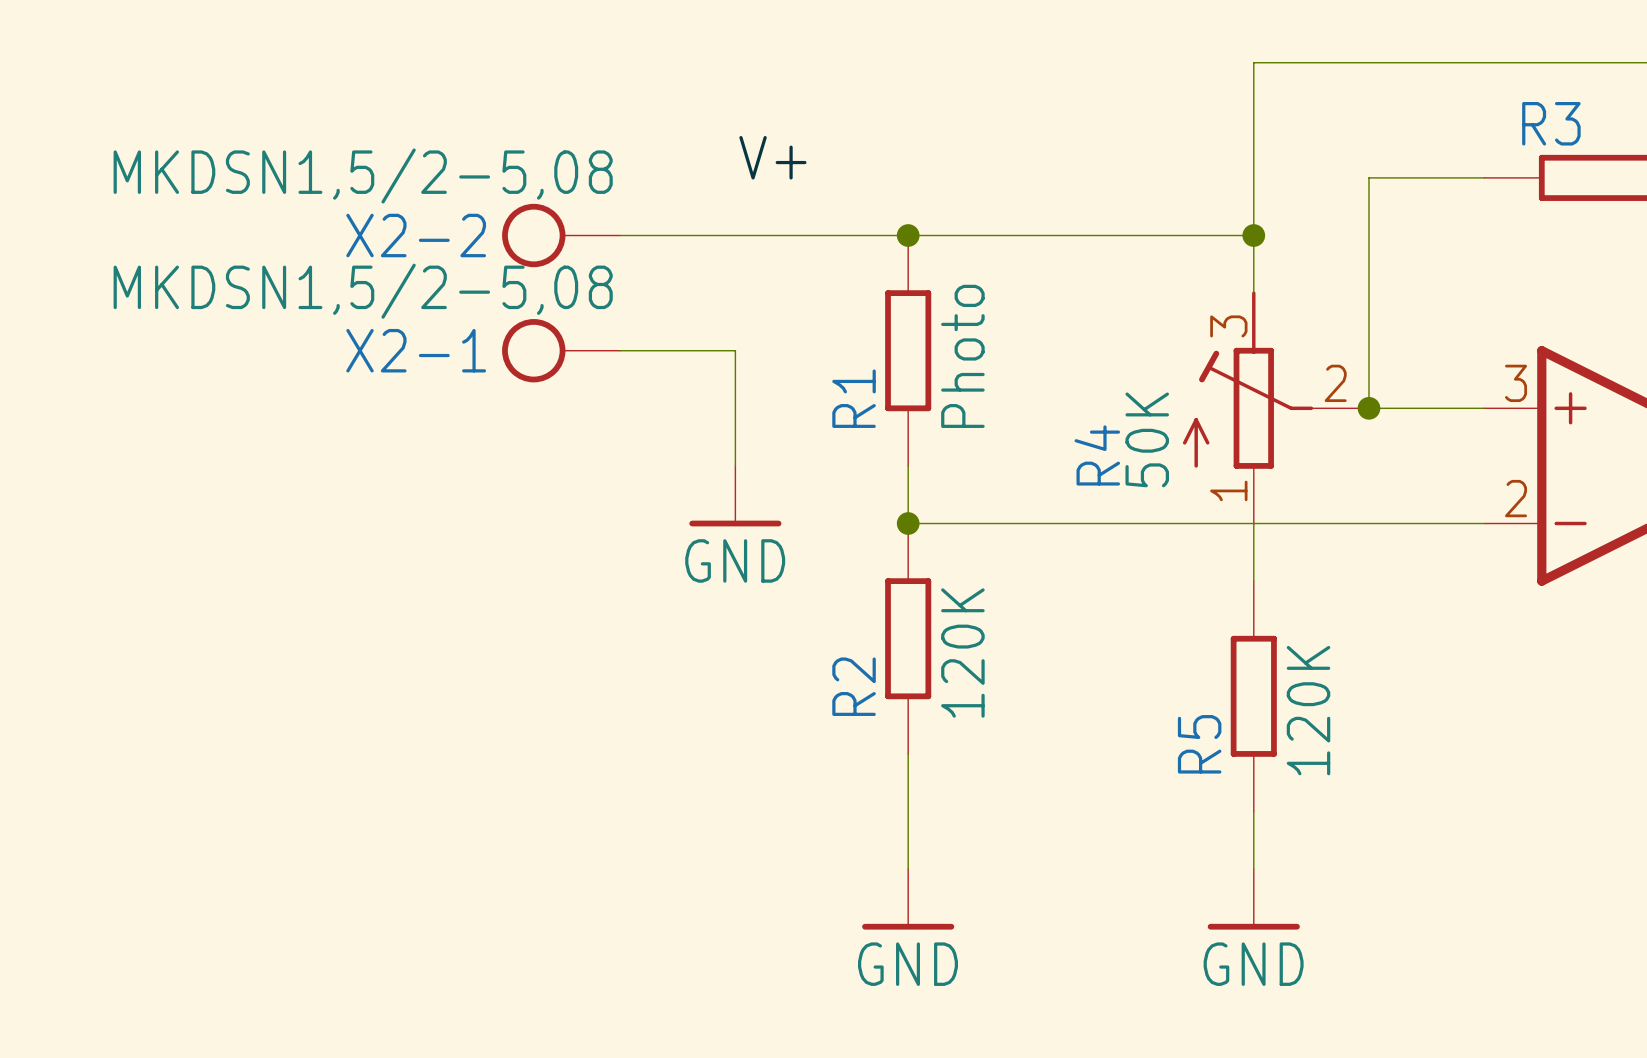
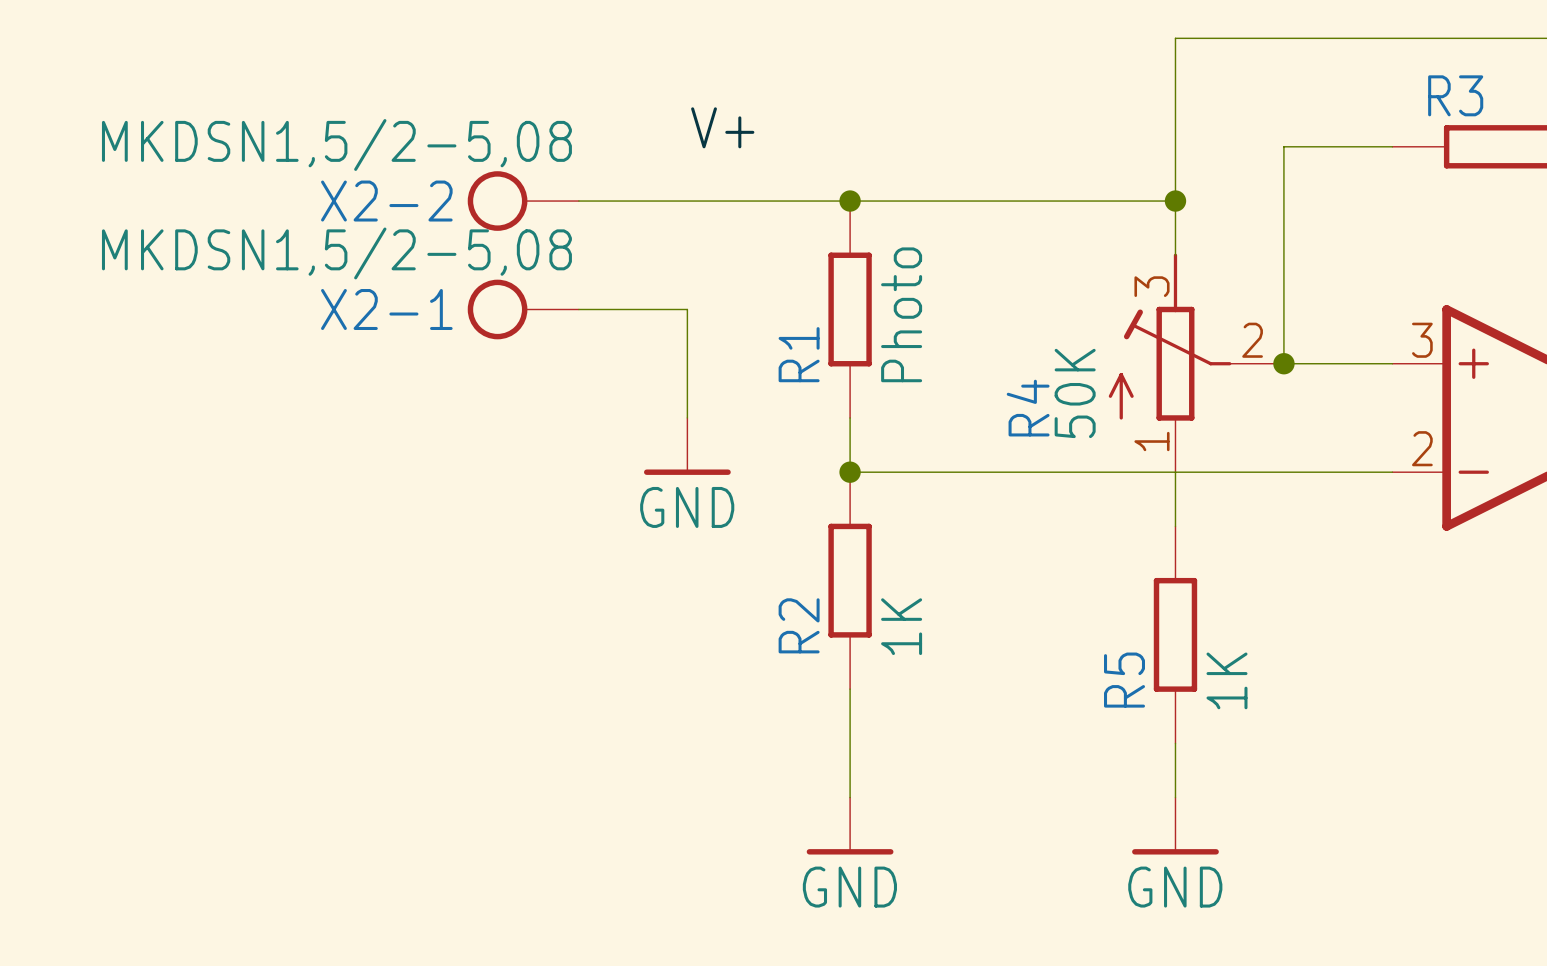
R2 value: 120K (962, 653) -> 1K (901, 626)
R5 value: 120K (1308, 710) -> 1K (1227, 680)

